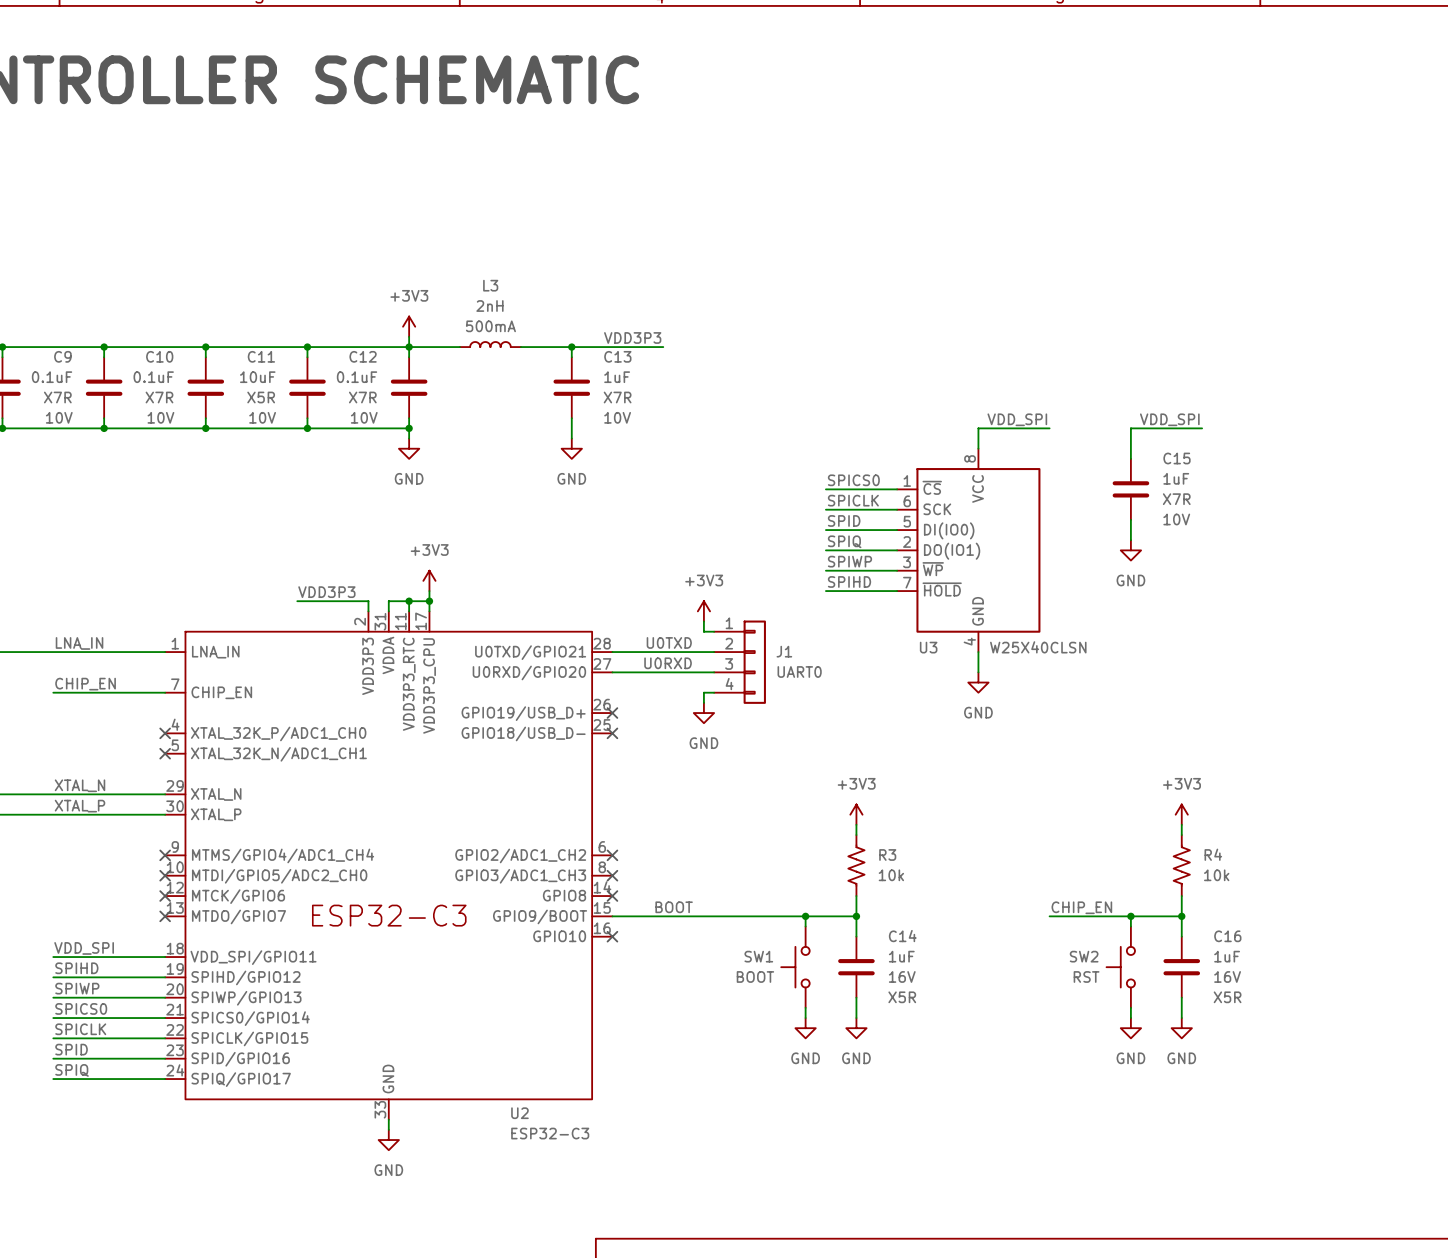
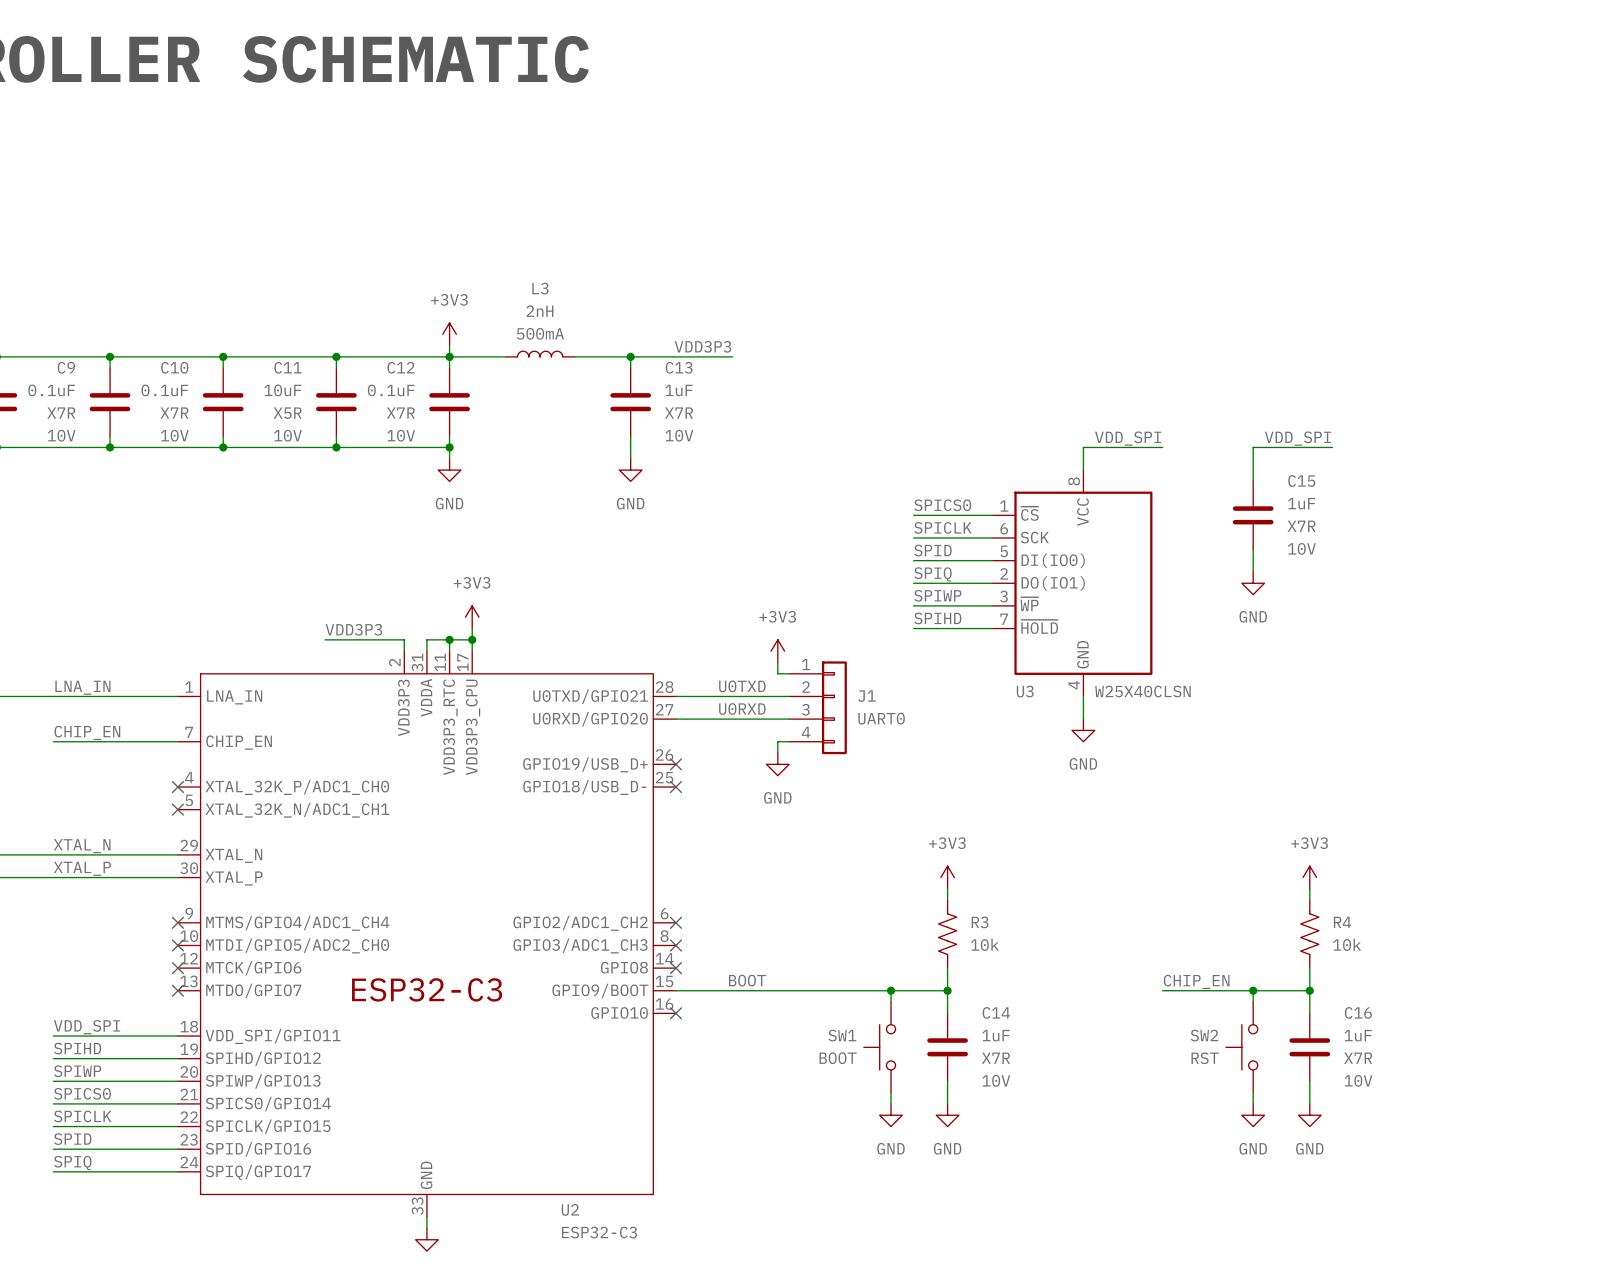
C14 text: 16V (902, 976) -> 10V (996, 1080)
C16 text: 16V (1227, 976) -> 10V (1358, 1080)
C14 text: X5R (902, 997) -> X7R (995, 1058)
C16 text: X5R (1227, 997) -> X7R (1358, 1058)

